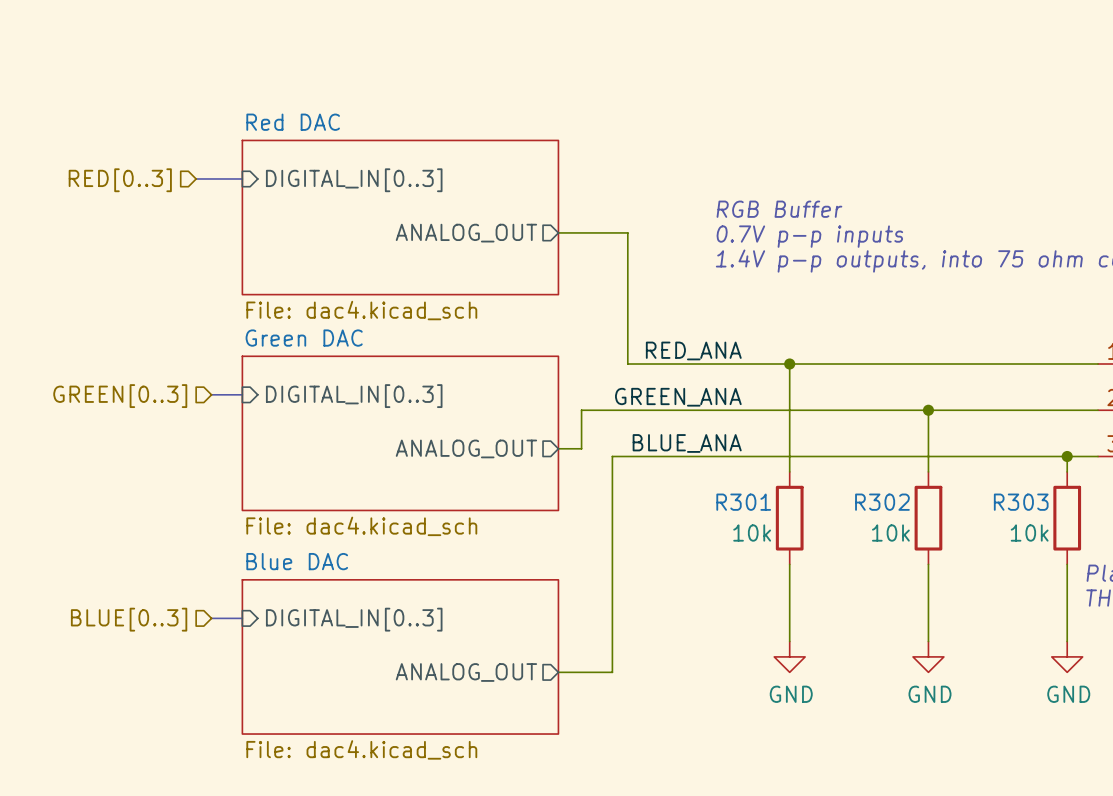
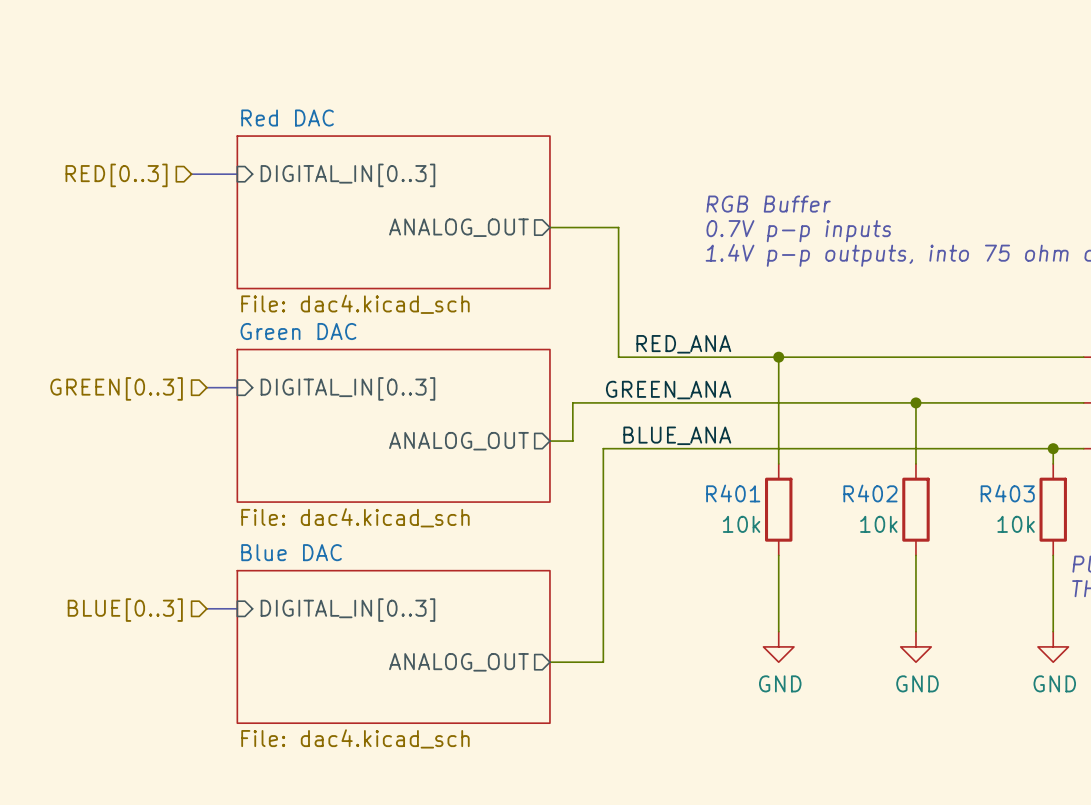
R301 name: R301 (743, 502) -> R401 (733, 493)
R302 name: R302 (882, 502) -> R402 (870, 493)
R303 name: R303 (1021, 502) -> R403 (1007, 493)

